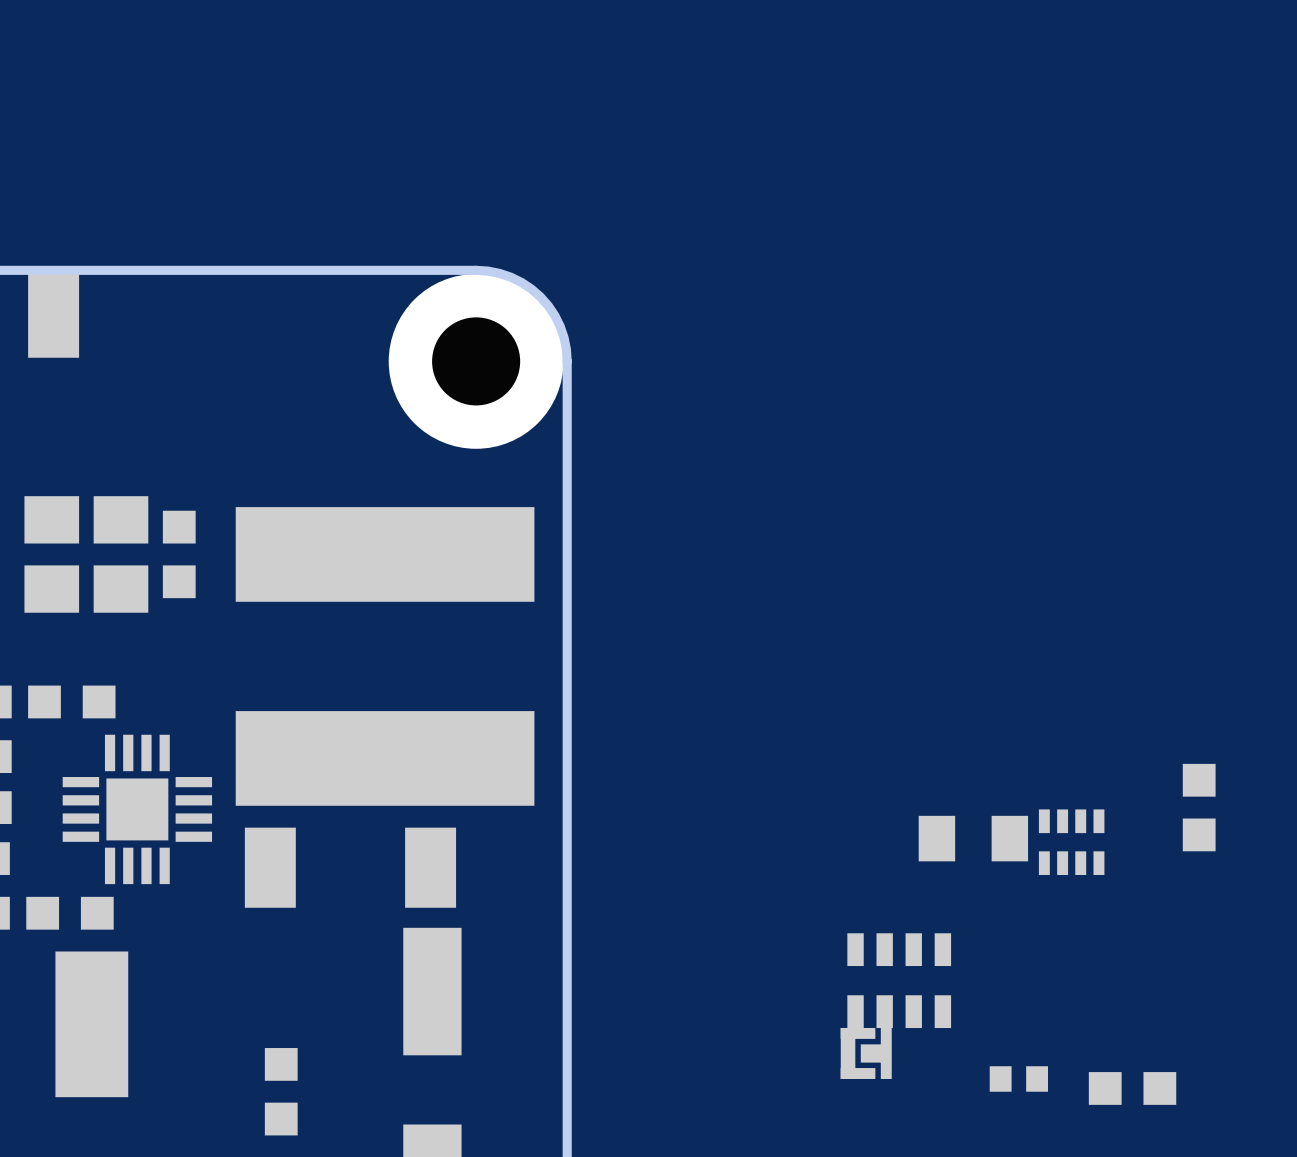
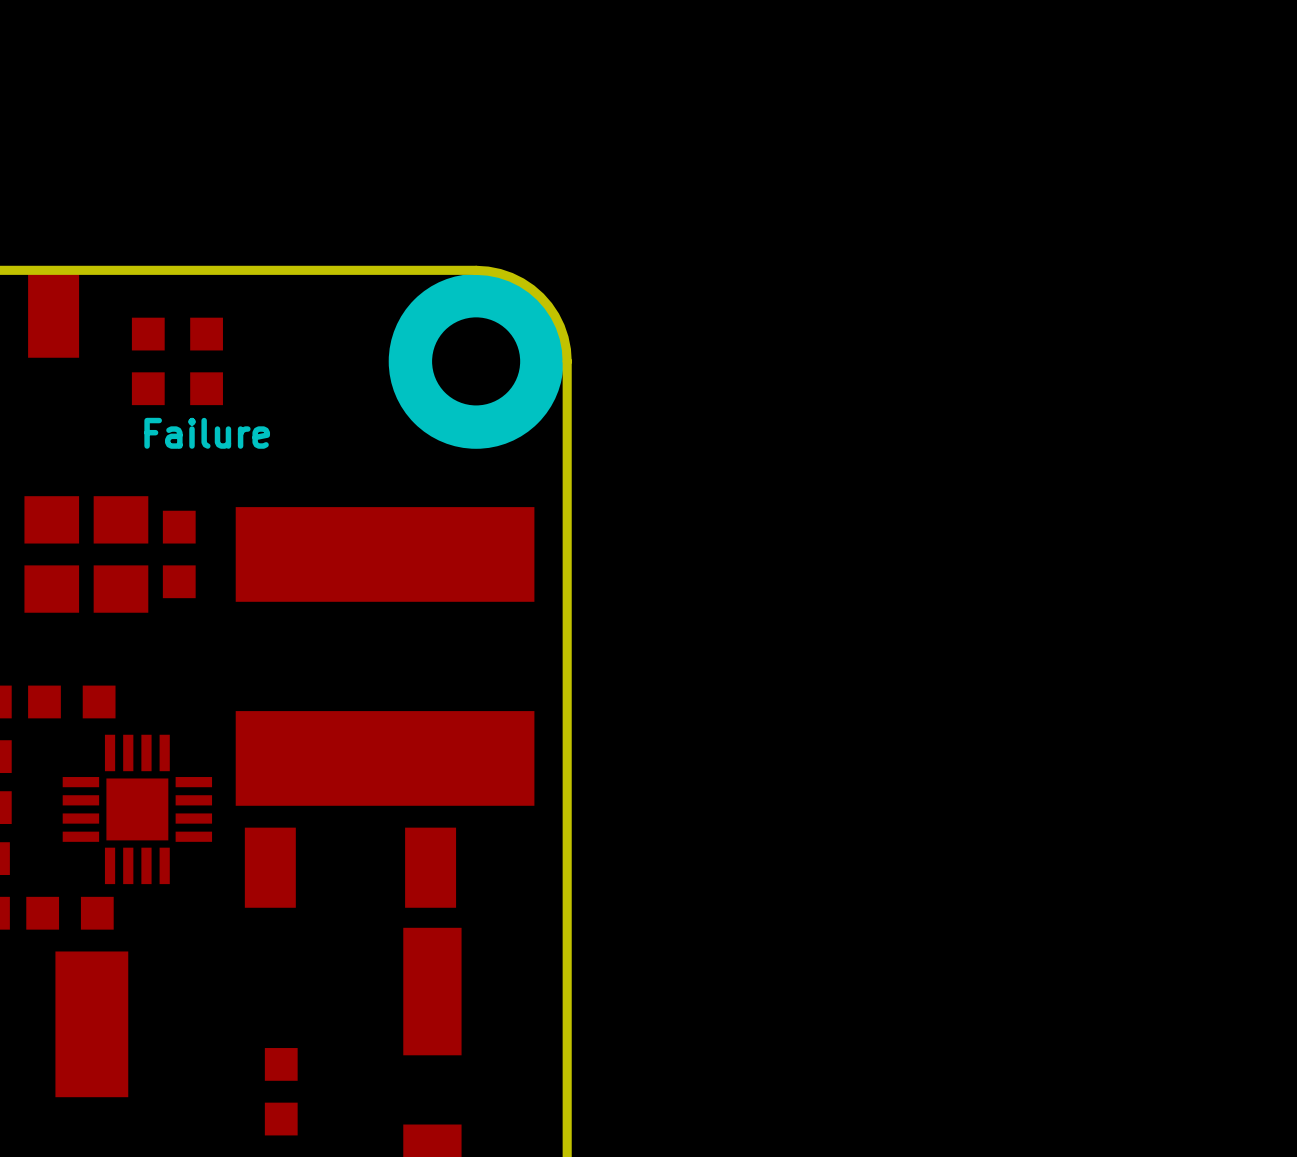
part: none -> (148, 361)
part: none -> (206, 361)
text: none -> Failure (207, 433)
part: (1199, 807) -> none
part: (973, 838) -> none
part: (1071, 842) -> none
part: (899, 980) -> none
part: (866, 1053) -> none
part: (1018, 1078) -> none
part: (1132, 1088) -> none

